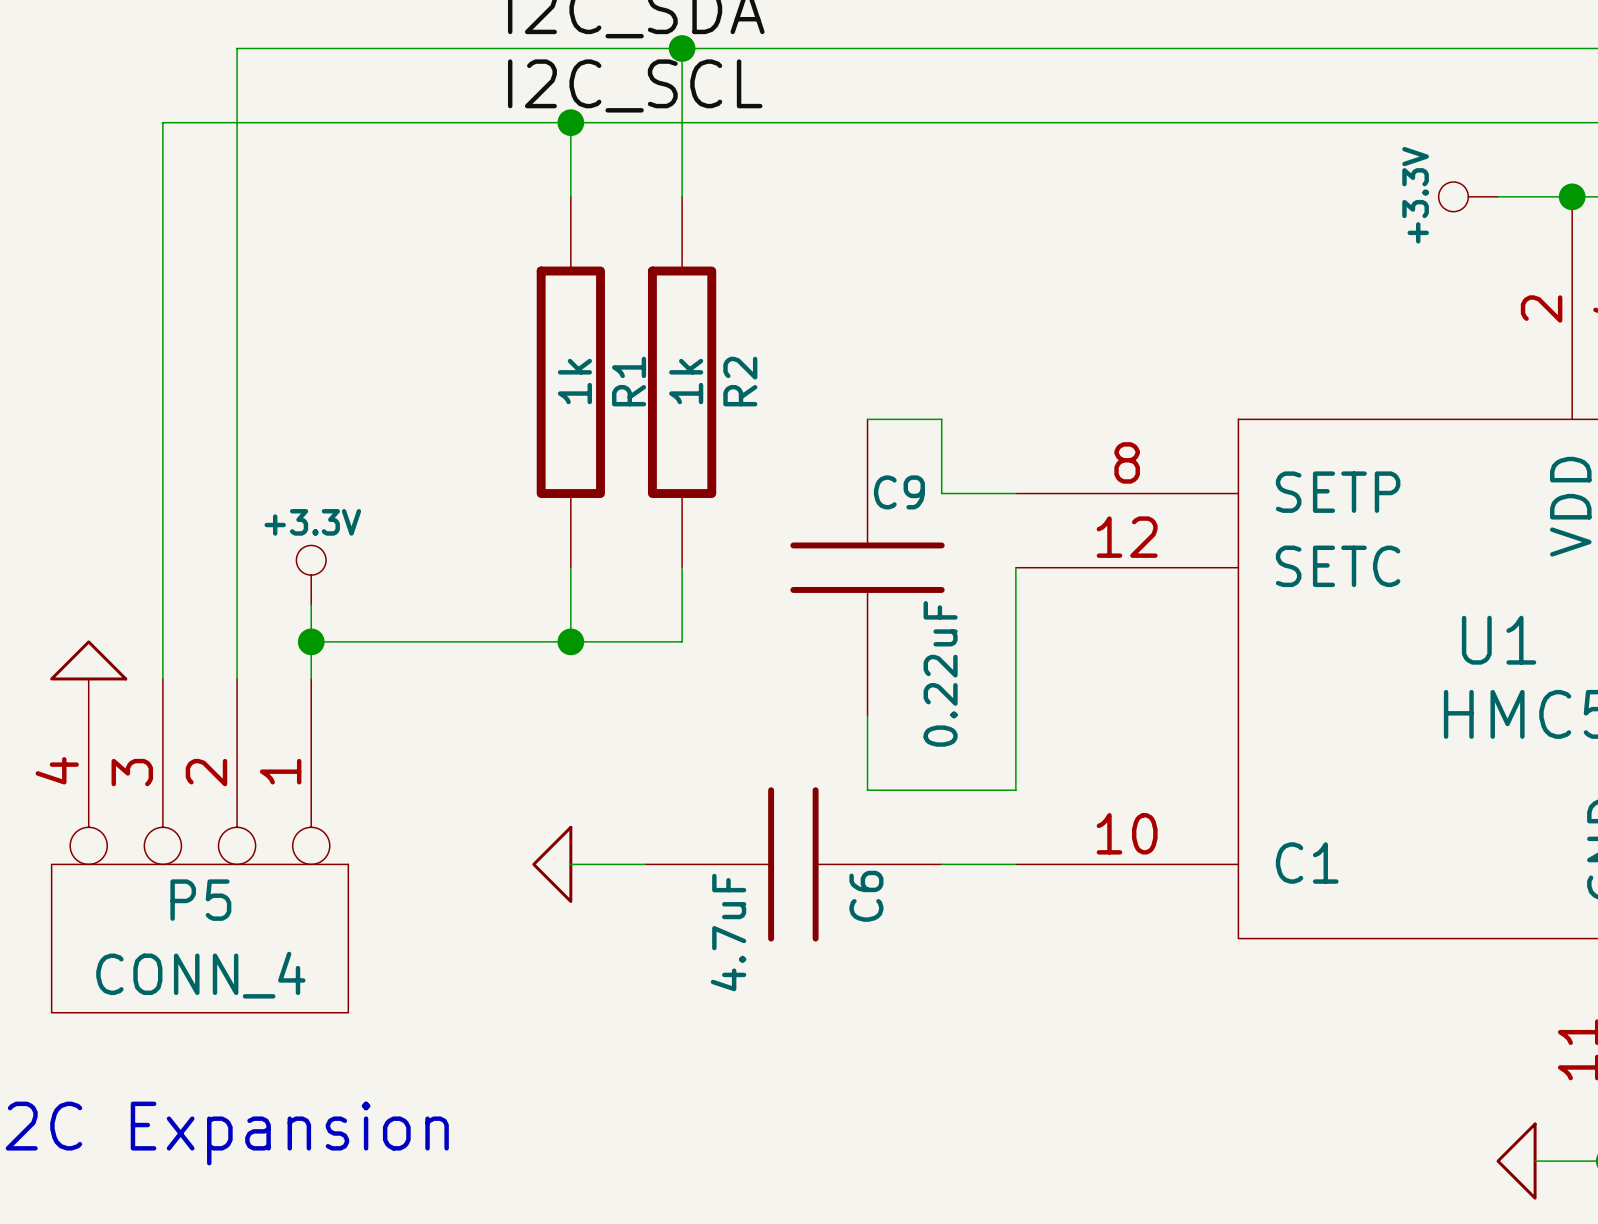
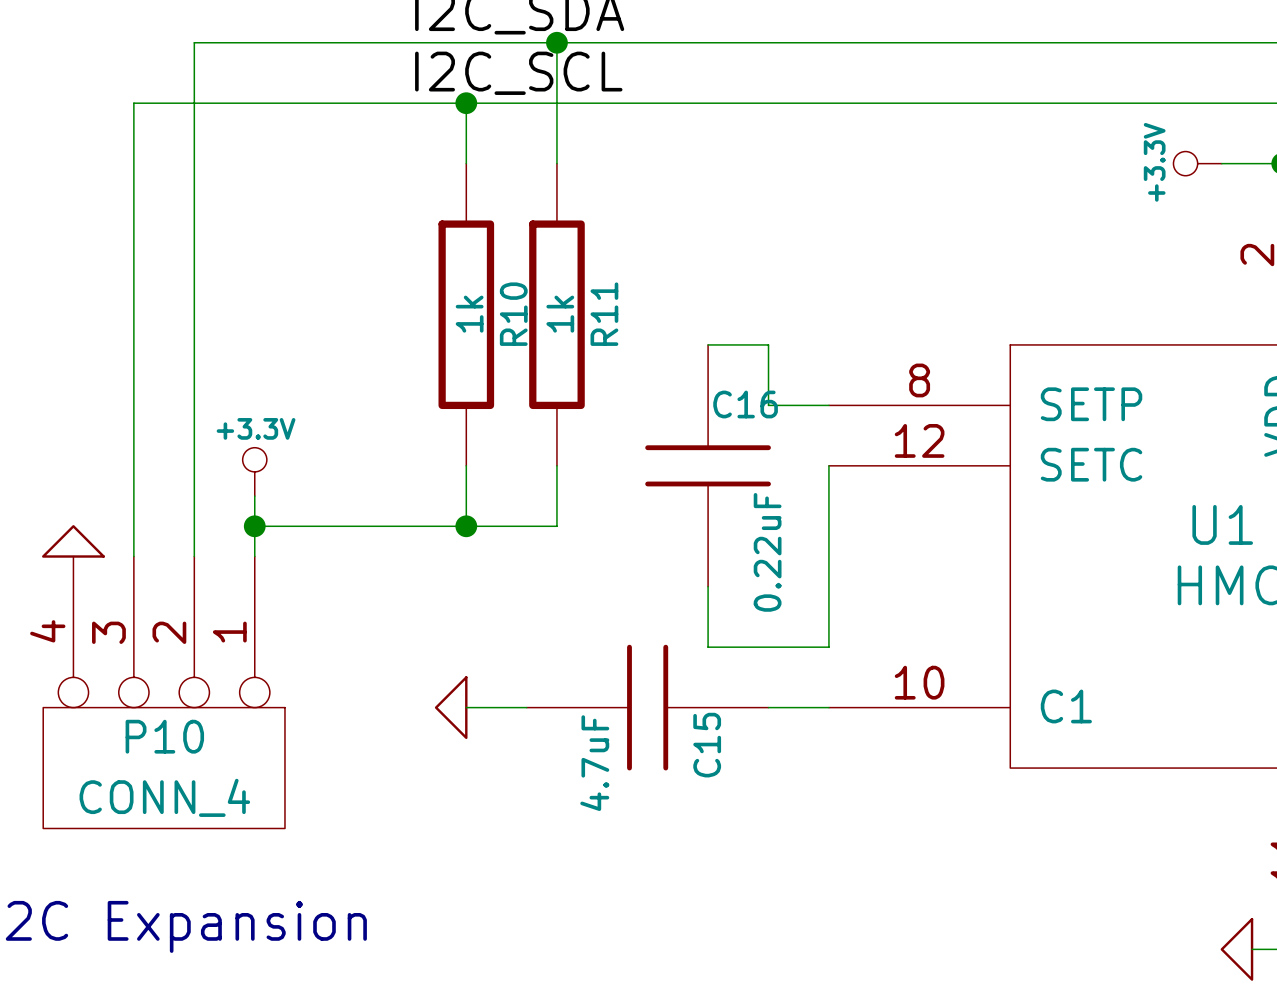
R1 name: R1 (629, 381) -> R10 (513, 314)
R2 name: R2 (740, 381) -> R11 (604, 314)
C9 name: C9 (899, 492) -> C16 (745, 404)
C6 name: C6 (866, 896) -> C15 (707, 745)
P5 name: P5 (200, 900) -> P10 (164, 736)

